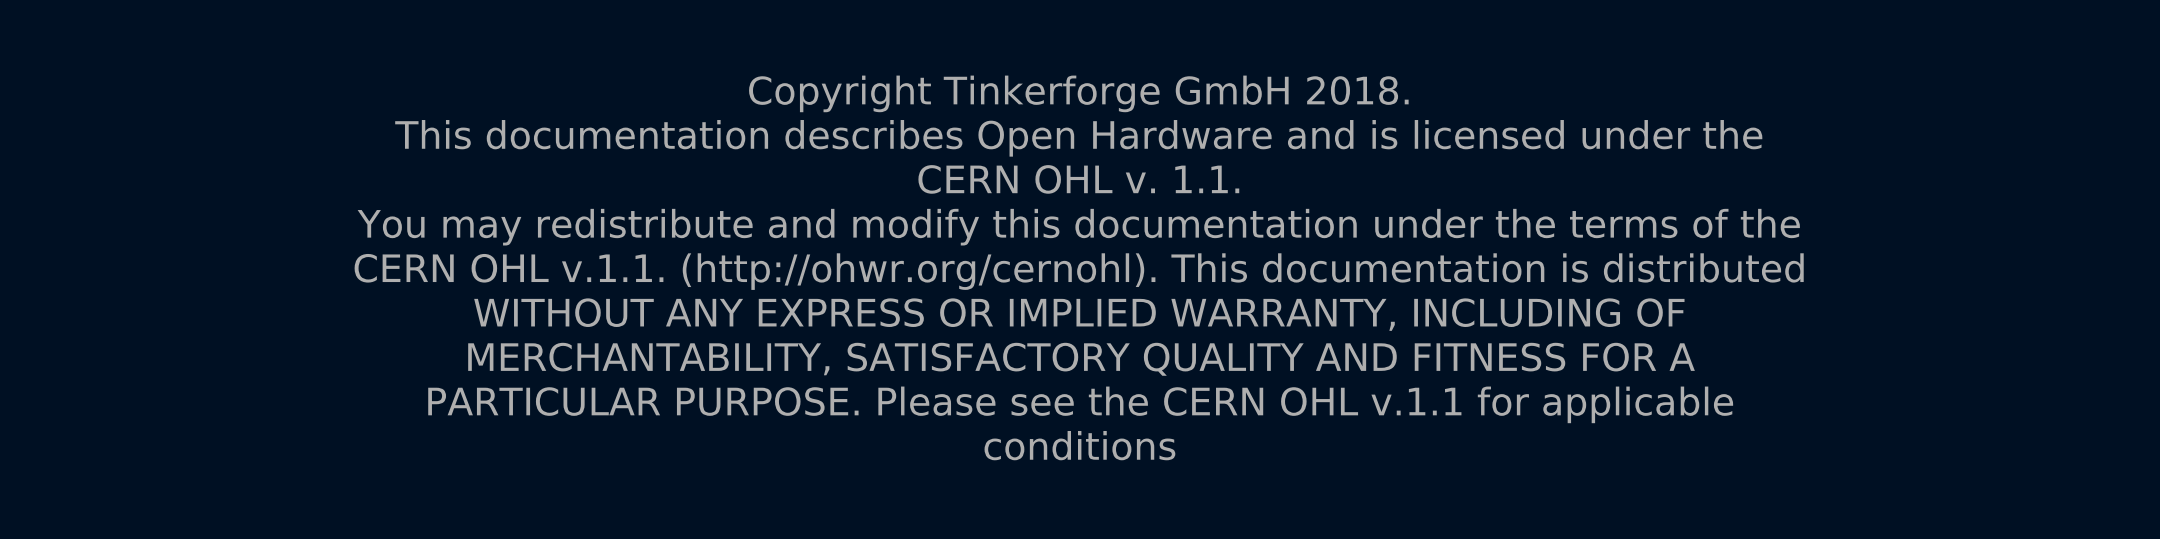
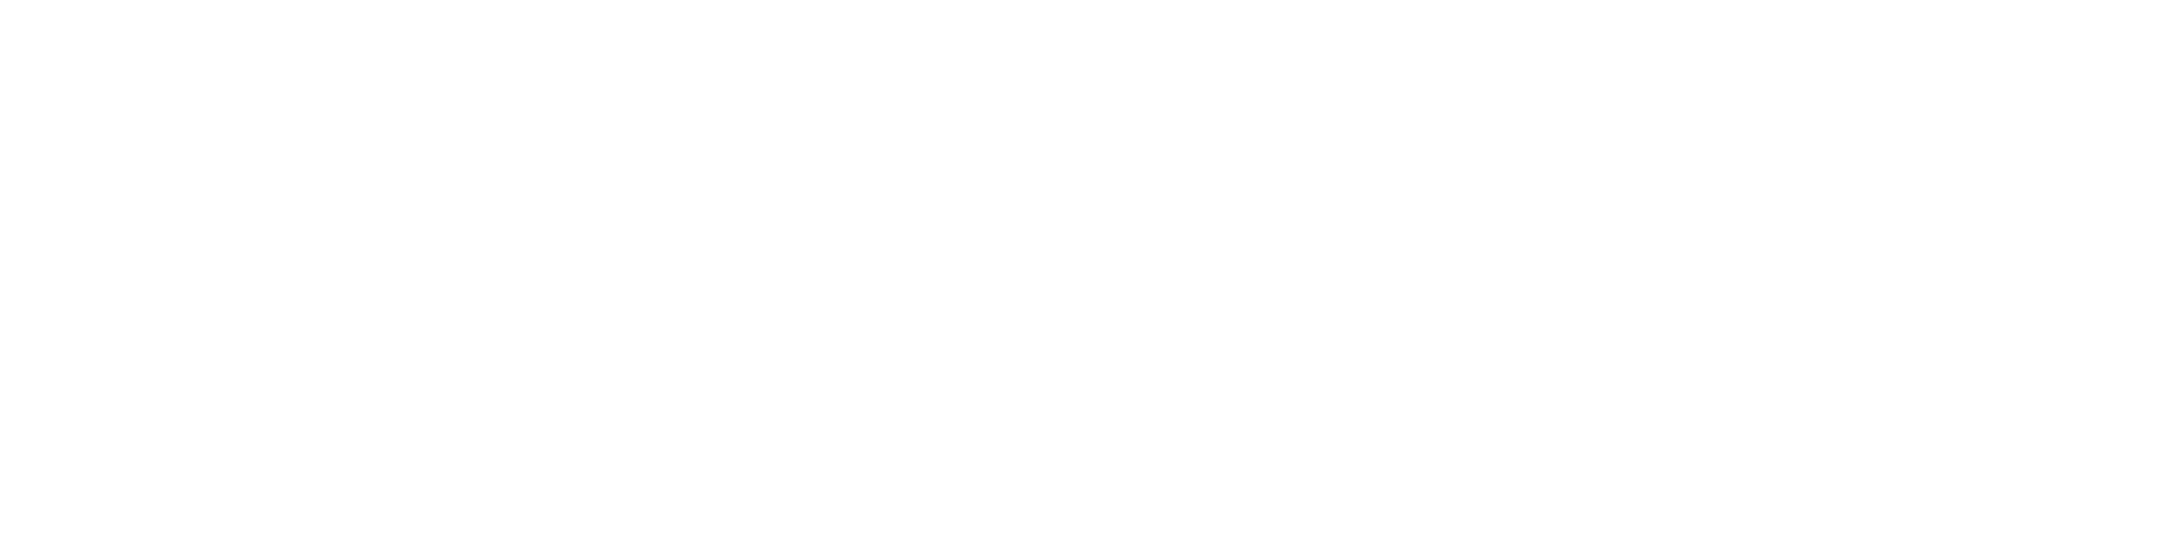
text: Copyright Tinkerforge GmbH 2018. (1078, 93) -> none
text: This documentation describes Open Hardware and is licensed under the (1078, 138) -> none
text: CERN OHL v. 1.1. (1078, 179) -> none
text: You may redistribute and modify this documentation under the terms of the (1078, 227) -> none
text: CERN OHL v.1.1. (http://ohwr.org/cernohl). This documentation is distributed (1079, 271) -> none
text: WITHOUT ANY EXPRESS OR IMPLIED WARRANTY, INCLUDING OF (1079, 314) -> none
text: MERCHANTABILITY, SATISFACTORY QUALITY AND FITNESS FOR A (1081, 359) -> none
text: PARTICULAR PURPOSE. Please see the CERN OHL v.1.1 for applicable (1080, 404) -> none
text: conditions (1079, 445) -> none

